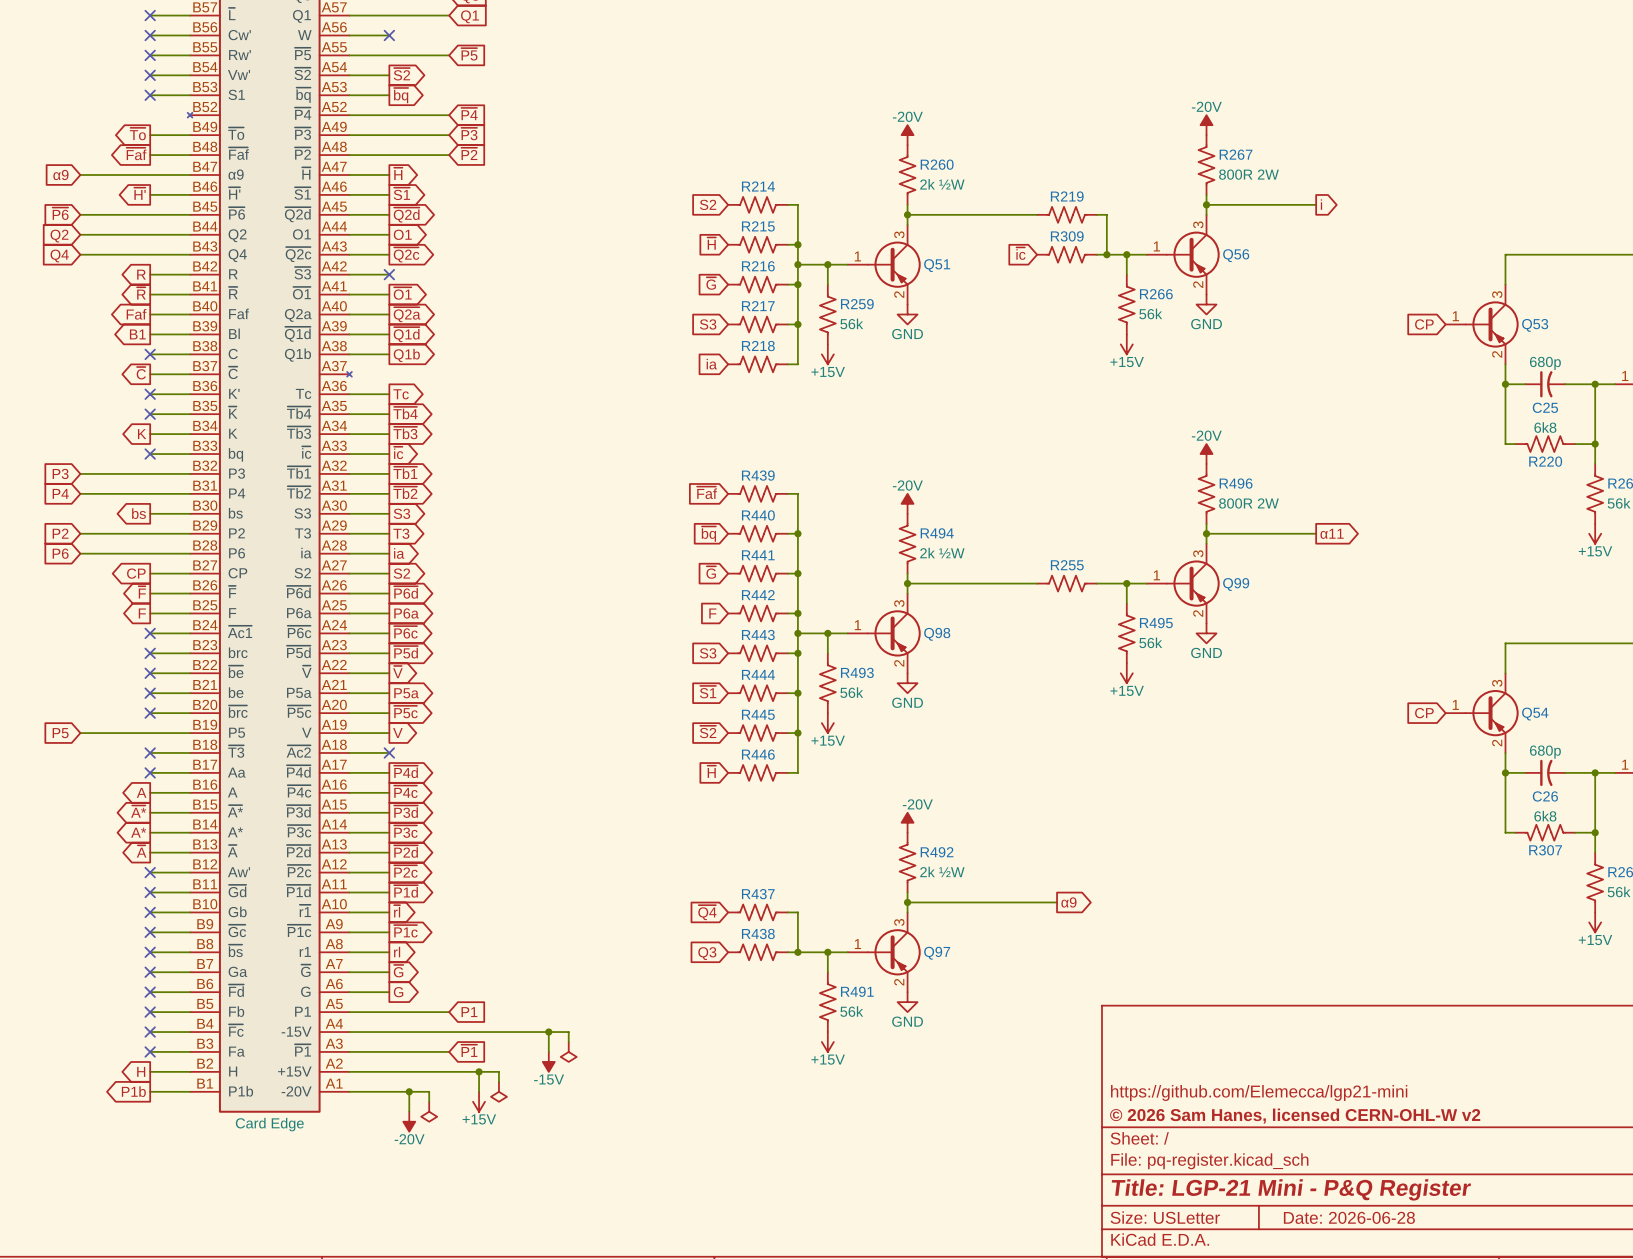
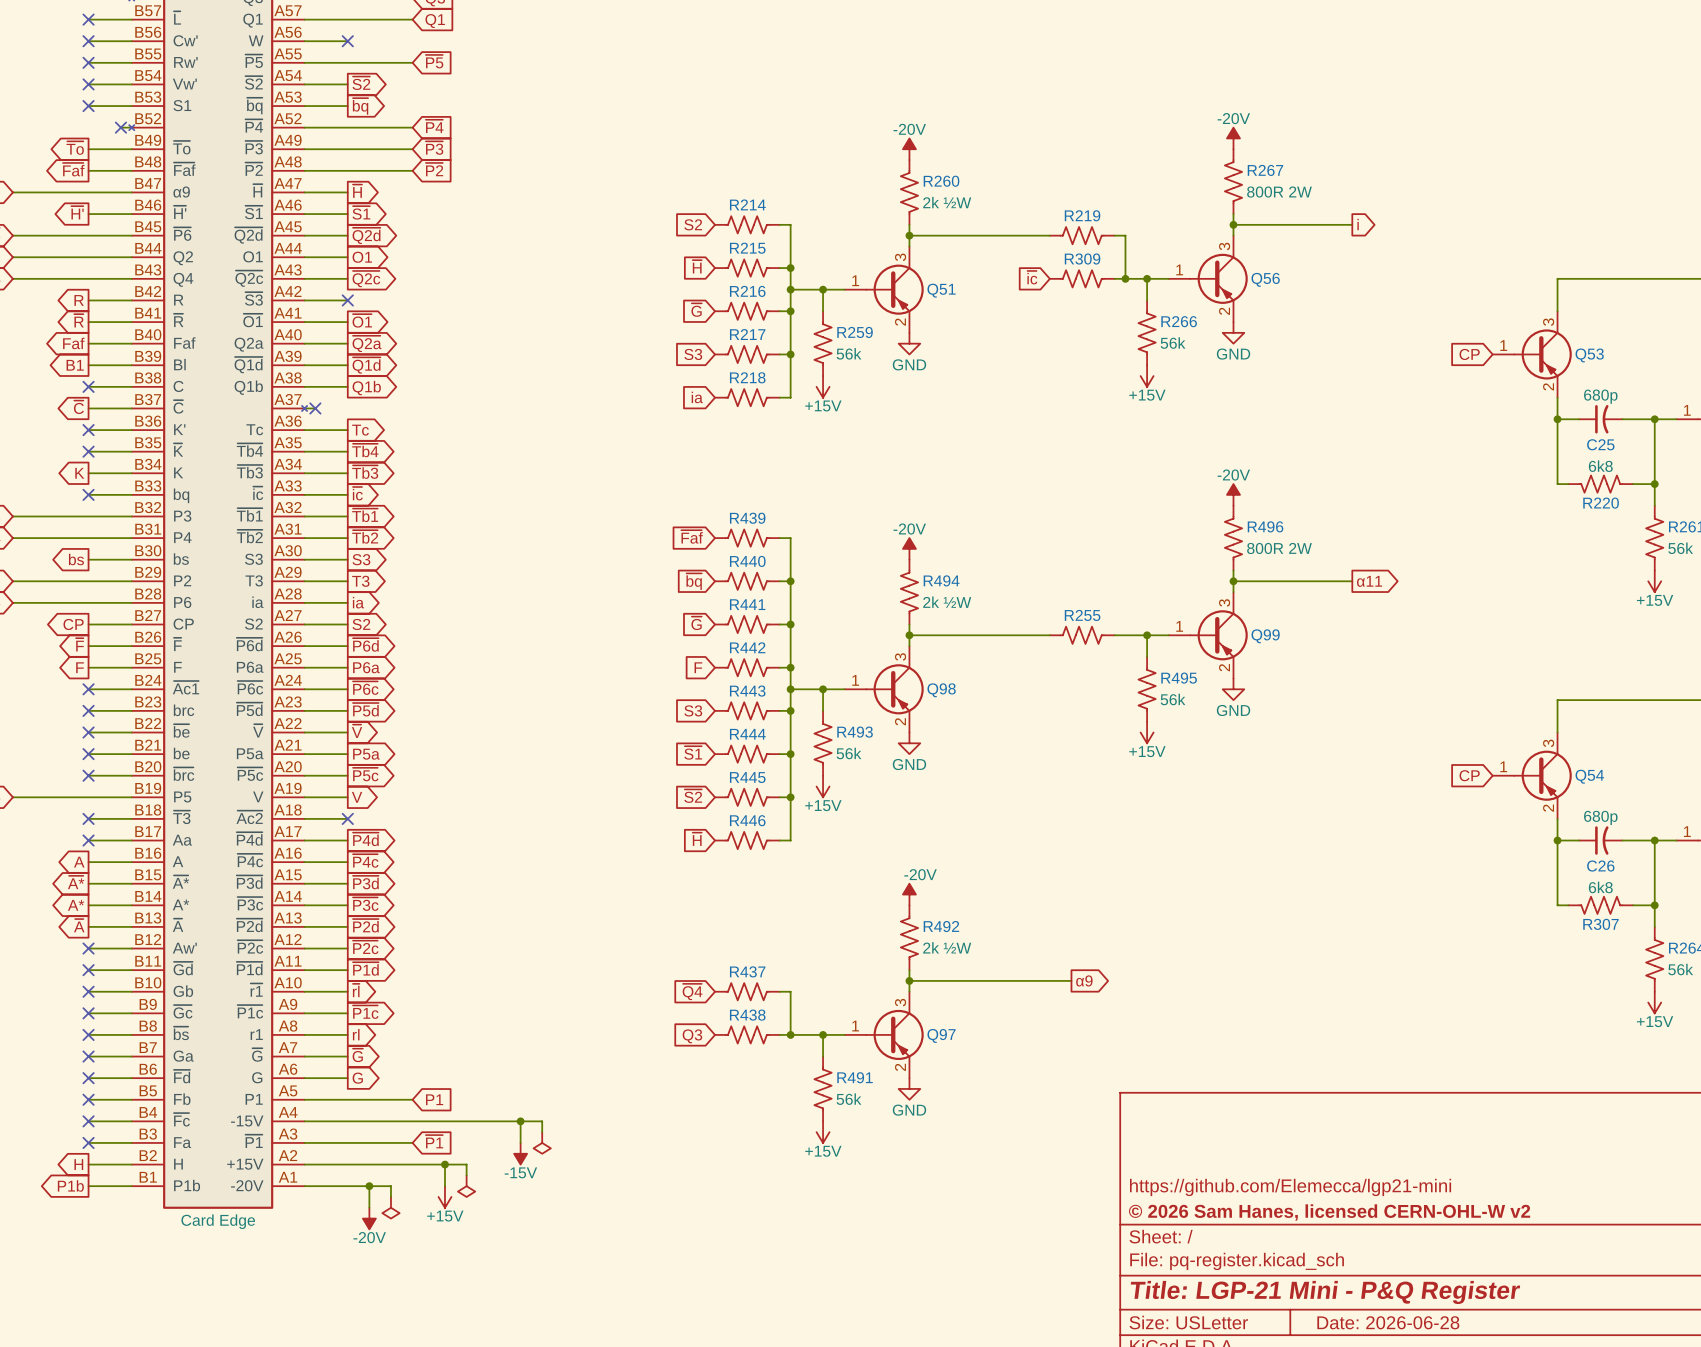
wire: none -> (120, 127) (131, 127)
no-connect mark: none -> (120, 127)
wire: none -> (304, 408) (315, 408)
no-connect mark: none -> (315, 408)

